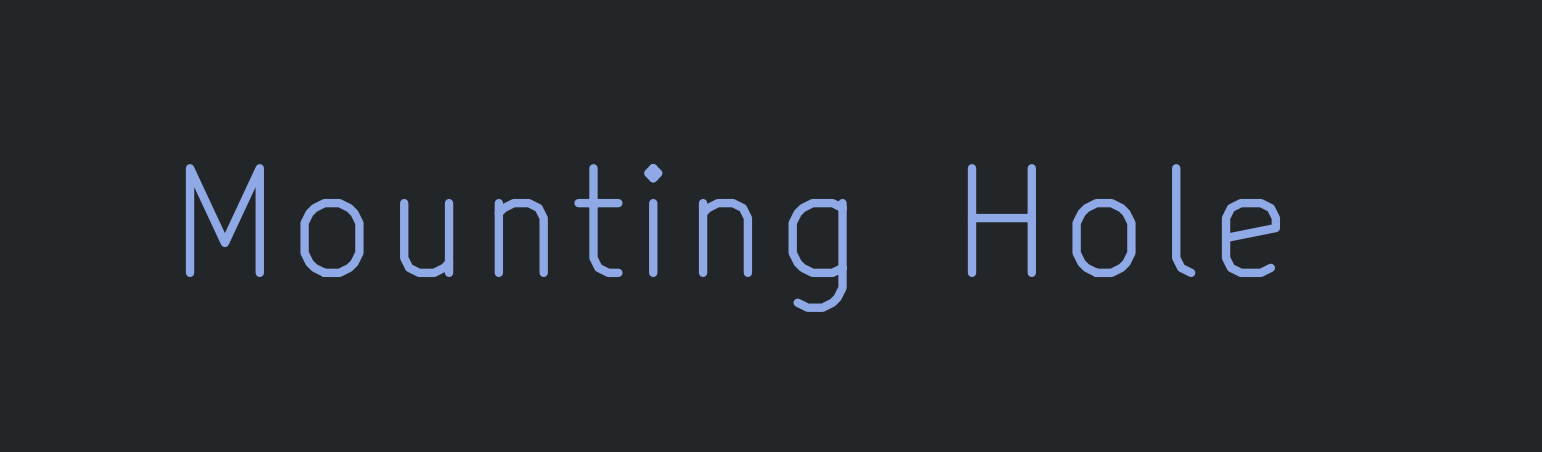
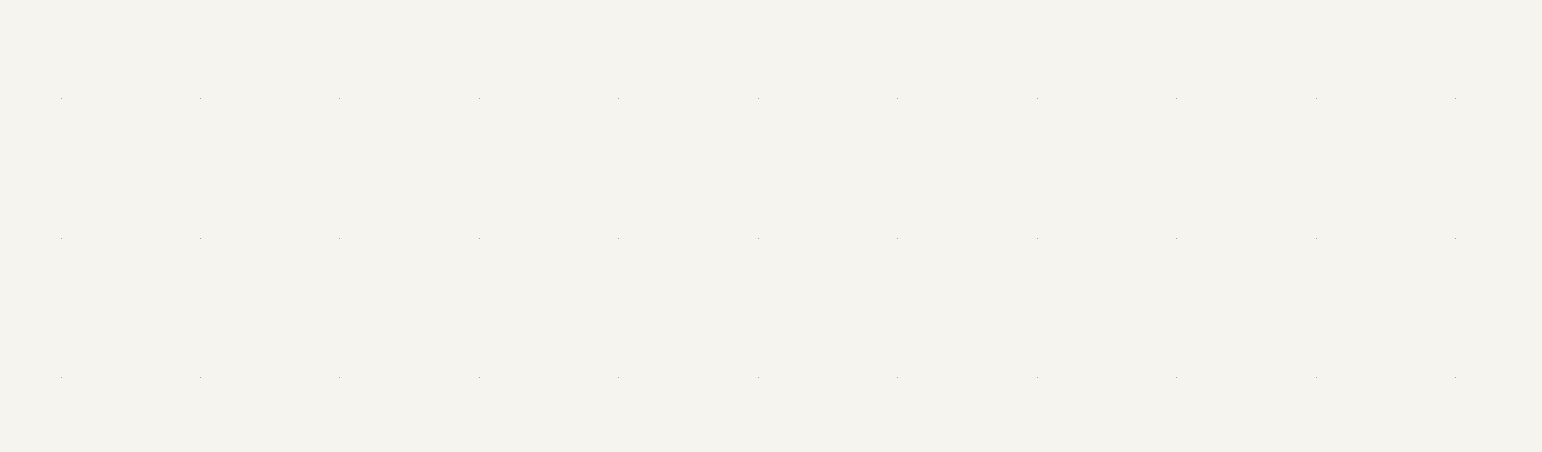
text: Mounting Hole (732, 237) -> none

